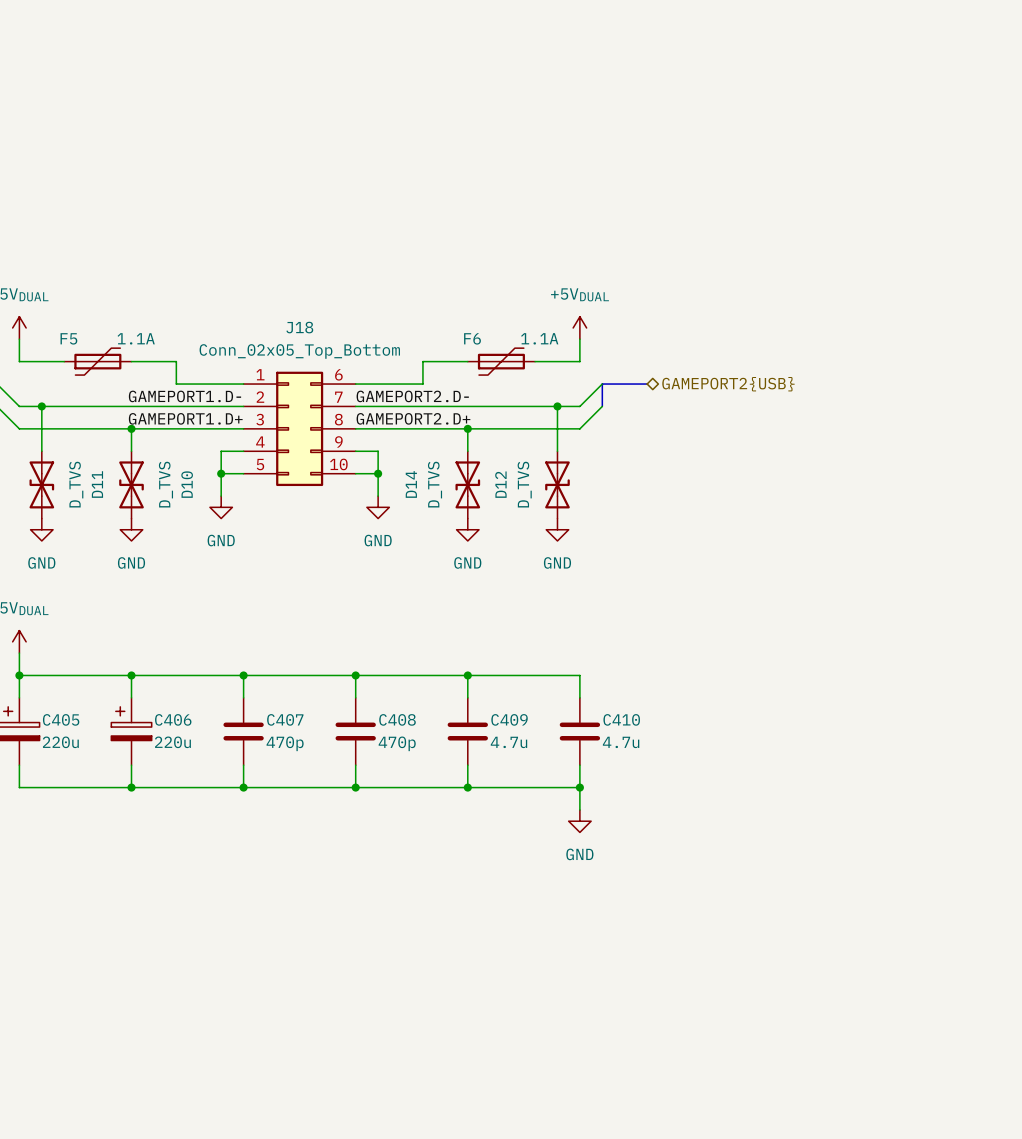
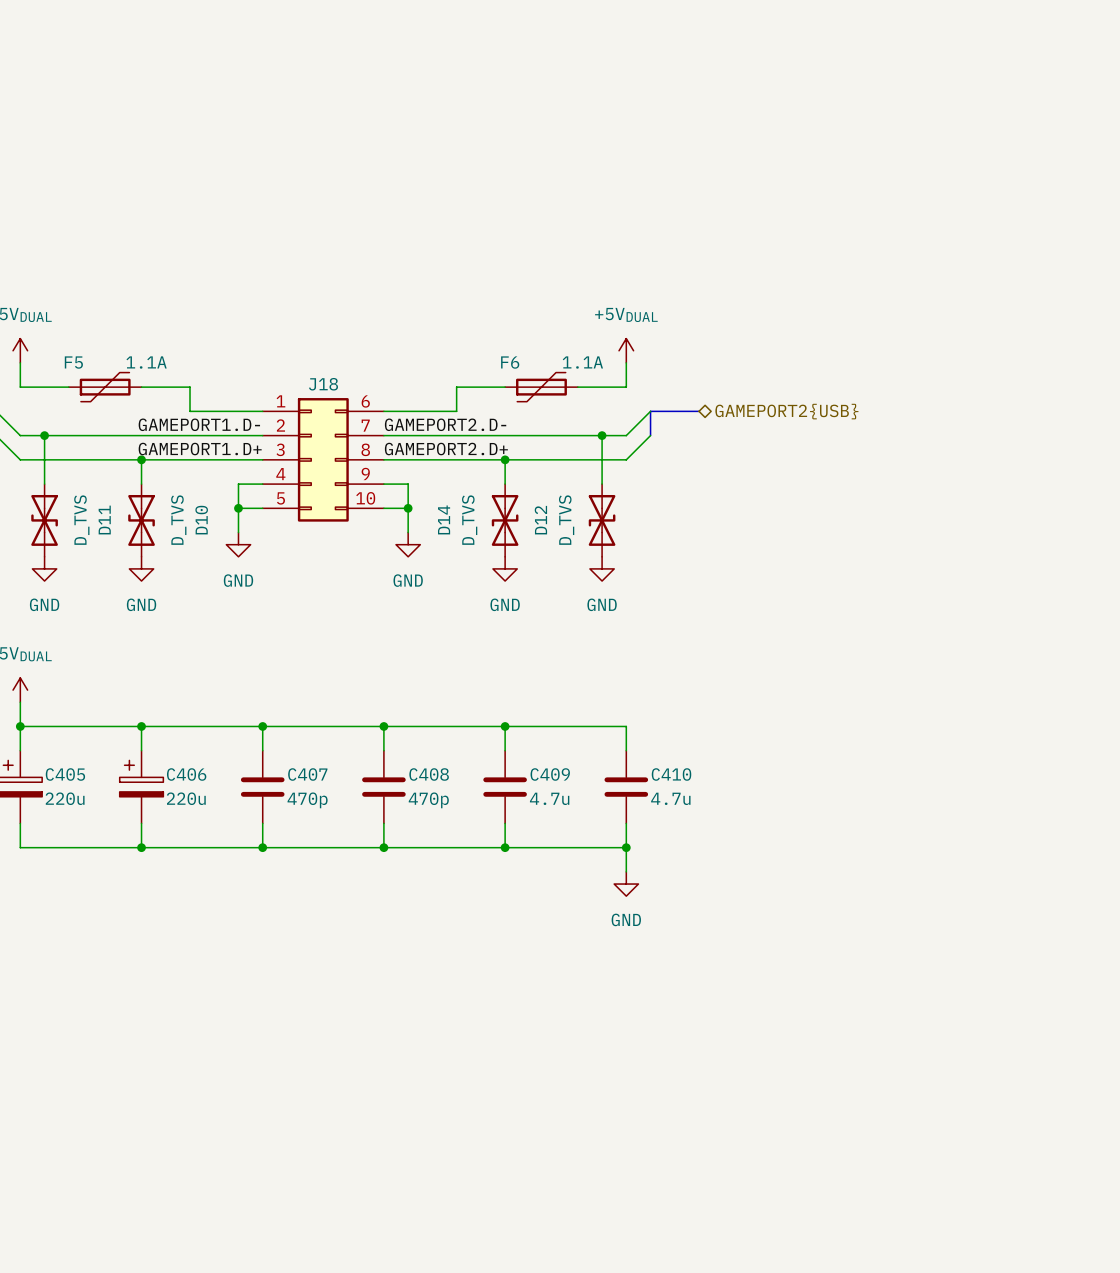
J18 name position: J18 (299, 327) -> J18 (323, 384)
J18 value: Conn_02x05_Top_Bottom (299, 351) -> none

